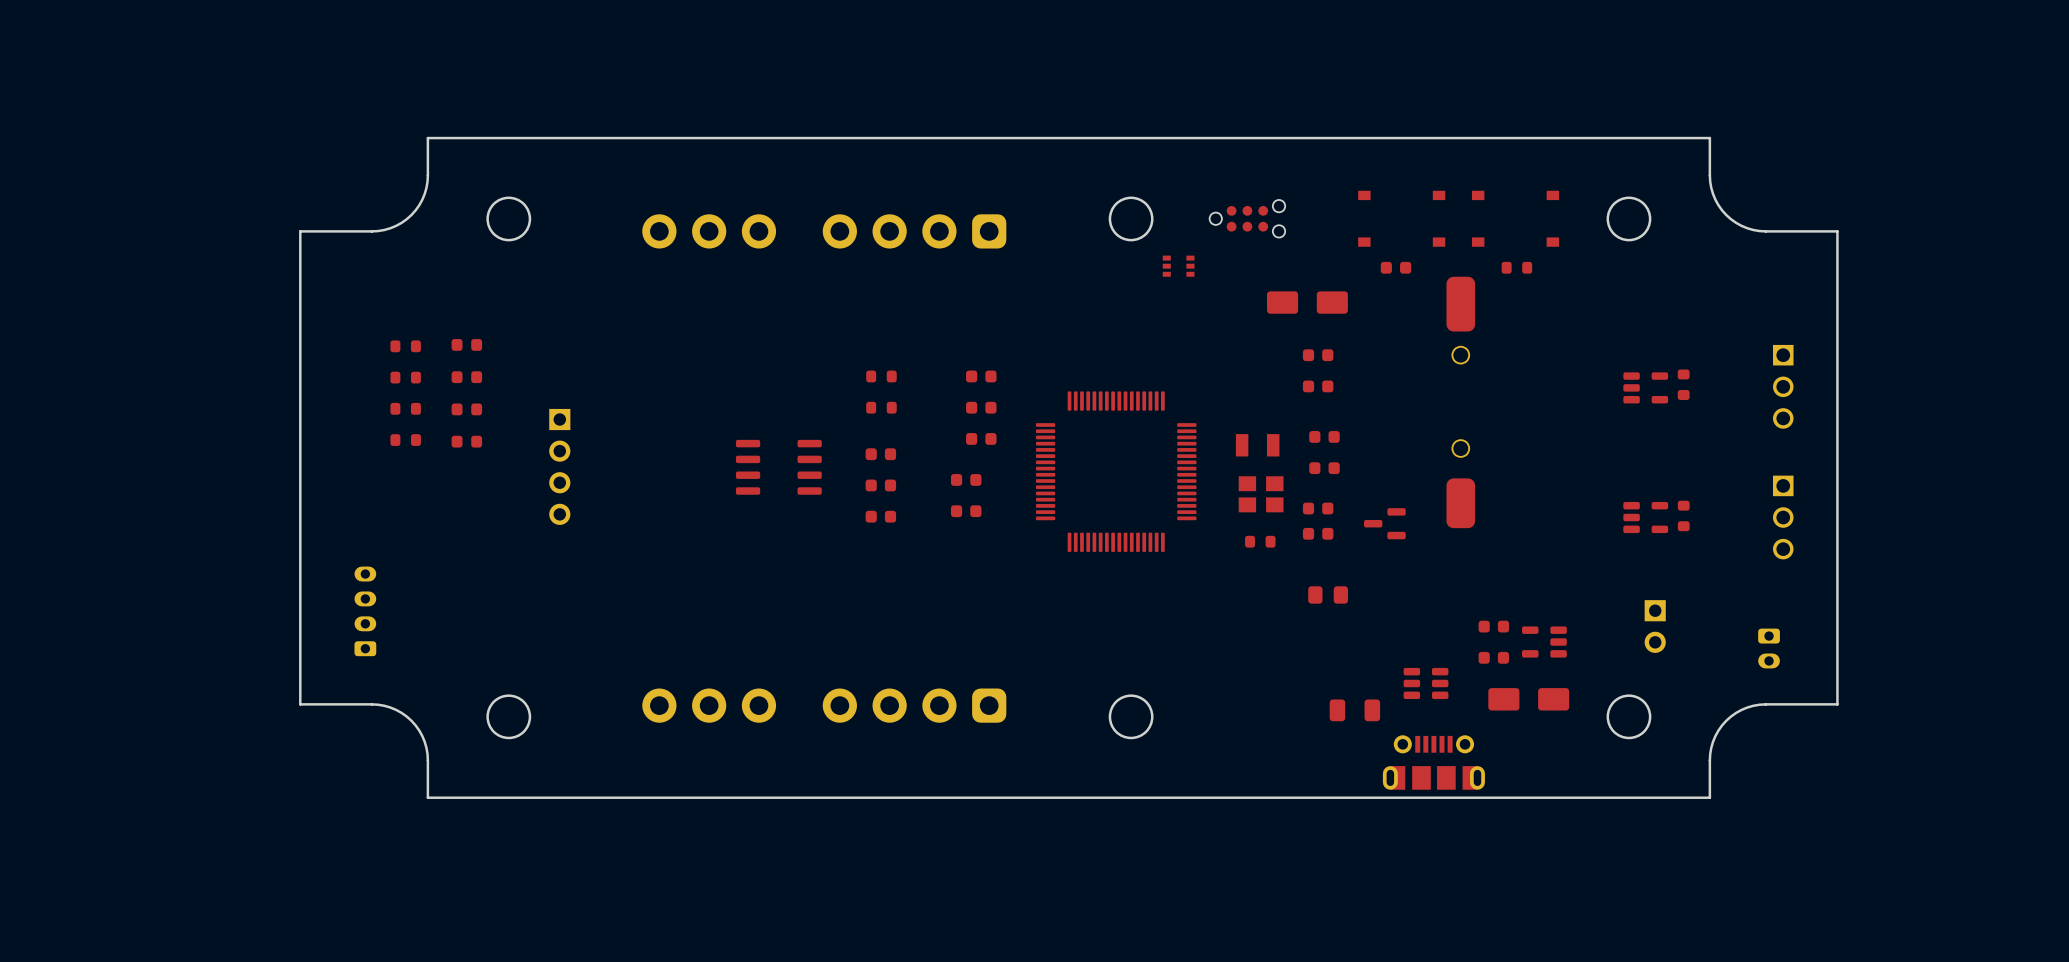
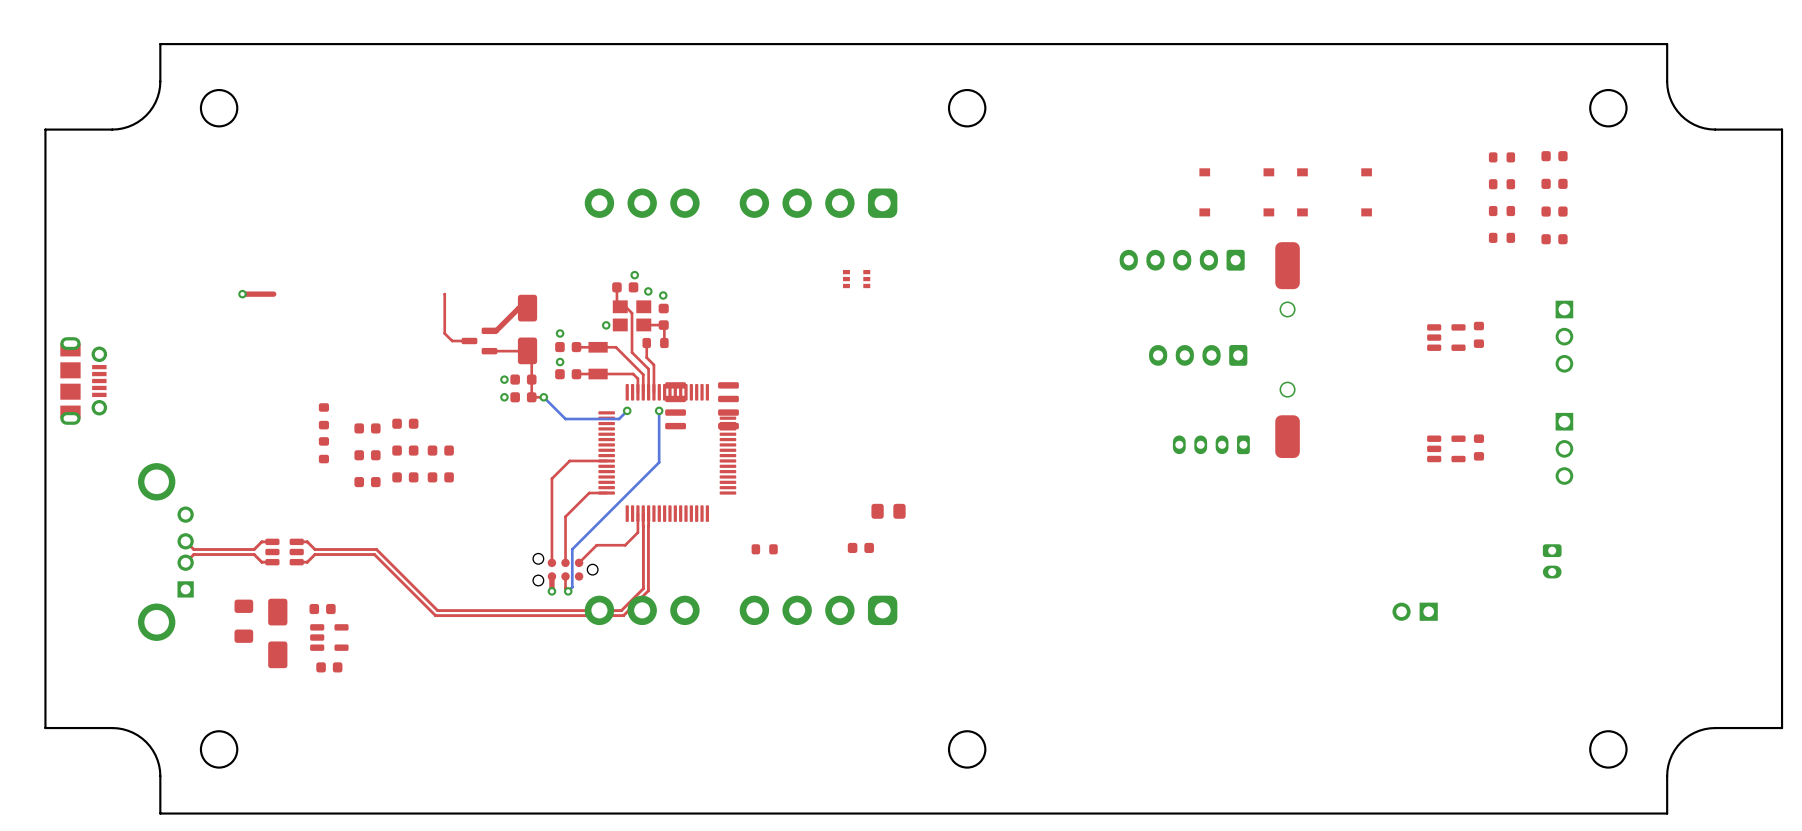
round board edge: none -> [199, 88, 239, 128]
board edge: (1709, 138) (1711, 187) (1718, 205) (1730, 219) (1741, 225) (1759, 231) (1837, 231) (1837, 704) (1759, 704) (1747, 707) (1730, 716) (1718, 730) (1711, 747) (1709, 797) (427, 797) (426, 747) (419, 730) (406, 716) (396, 709) (378, 704) (300, 704) (300, 231) (378, 231) (390, 228) (406, 219) (419, 205) (426, 187) (427, 138) (1709, 138) -> (1667, 44) (1668, 92) (1674, 107) (1685, 119) (1699, 126) (1709, 129) (1782, 129) (1782, 728) (1709, 728) (1699, 730) (1685, 738) (1674, 750) (1668, 765) (1667, 813) (160, 813) (159, 765) (152, 750) (142, 738) (128, 730) (117, 728) (45, 728) (45, 129) (117, 129) (128, 126) (142, 119) (152, 107) (159, 92) (160, 44) (1667, 44)
part: none -> (1554, 156)
part: none -> (1501, 157)
round board edge: [486, 196, 532, 242] -> none
part: none -> (1554, 183)
part: none -> (1501, 184)
round board edge position: (1131, 218) -> (967, 108)
part: (1247, 218) -> none
round board edge position: (1628, 218) -> (1608, 108)
part: none -> (1501, 211)
part: none -> (1554, 211)
part position: (1178, 266) -> (856, 279)
part: (1395, 267) -> none
part: (1516, 267) -> none
part: none -> (1501, 237)
part: none -> (1554, 239)
part: none -> (1182, 260)
part: (1307, 302) -> none
via: none -> (634, 275)
top track: none -> (616, 287) (616, 303) (620, 306) (625, 306) (632, 313) (632, 352) (648, 369) (648, 392)
part: none -> (625, 287)
via: none -> (648, 291)
via: none -> (242, 294)
top track: none -> (273, 294) (242, 294)
top track: none -> (444, 294) (444, 333) (452, 340) (469, 340)
via: none -> (663, 295)
part: (466, 344) -> none
part: (405, 346) -> none
top track: none -> (527, 308) (518, 308) (496, 330) (489, 330)
part: (1318, 355) -> none
part: none -> (632, 315)
part: none -> (663, 316)
via: none -> (606, 325)
top track: none -> (643, 325) (663, 325) (664, 343)
part: (881, 376) -> none
part: (981, 376) -> none
part: (405, 377) -> none
part: (466, 377) -> none
part: none -> (527, 329)
via: none -> (560, 333)
part: (1318, 386) -> none
part: none -> (479, 340)
top track: none -> (646, 343) (646, 357) (653, 364) (653, 392)
part: none -> (655, 343)
part: none -> (568, 347)
top track: none -> (576, 347) (615, 347) (643, 374) (643, 392)
top track: none -> (489, 351) (527, 350) (531, 355) (531, 397) (543, 397)
part: (881, 407) -> none
part: (981, 407) -> none
part: (405, 408) -> none
part: none -> (1198, 355)
part: (466, 409) -> none
part: none -> (598, 360)
via: none -> (560, 362)
part: none -> (568, 374)
top track: none -> (576, 374) (633, 374) (637, 378) (637, 392)
via: none -> (504, 379)
part: none -> (523, 379)
part: (1324, 436) -> none
part: none -> (83, 381)
part: (981, 438) -> none
part: (405, 440) -> none
part: (466, 441) -> none
part: (1257, 445) -> none
part: (880, 454) -> none
via: none -> (504, 397)
part: none -> (523, 397)
bottom track: none -> (543, 397) (565, 419) (619, 419) (627, 410)
via: none -> (543, 397)
part: (559, 466) -> none
part: (1324, 468) -> none
part: (1116, 471) -> none
via: none -> (627, 410)
bottom track: none -> (659, 410) (659, 462) (572, 549) (572, 587) (568, 591)
via: none -> (659, 410)
part: none -> (323, 416)
part: (966, 479) -> none
part: (880, 485) -> none
part: none -> (405, 423)
part: none -> (367, 428)
part: (1261, 494) -> none
part: (1318, 508) -> none
part: (966, 511) -> none
part: none -> (1211, 444)
part: (880, 516) -> none
part: none -> (323, 450)
part: none -> (405, 450)
part: none -> (440, 450)
part: none -> (667, 452)
part: (1384, 523) -> none
part: none -> (367, 455)
top track: none -> (606, 460) (569, 460) (551, 478) (551, 562)
part: (1318, 533) -> none
part: (1260, 541) -> none
part: none -> (405, 477)
part: none -> (440, 477)
part: none -> (367, 482)
top track: none -> (606, 493) (589, 493) (565, 516) (565, 562)
part: none -> (888, 511)
top track: none -> (637, 513) (637, 532) (625, 545) (596, 545) (579, 562)
top track: none -> (643, 513) (643, 588) (621, 610) (437, 610) (376, 549) (314, 549) (307, 541) (296, 541)
top track: none -> (648, 513) (648, 590) (623, 615) (435, 615) (374, 554) (314, 554) (307, 562) (296, 562)
part: (1328, 594) -> none
part: (365, 611) -> none
top track: none -> (185, 541) (193, 549) (254, 549) (261, 541) (272, 541)
part: (1493, 626) -> none
part rotation: 0° (1655, 626) -> 90° clockwise (1415, 611)
part position: (1655, 626) -> (1415, 611)
part: none -> (860, 547)
part: none -> (764, 549)
part: none -> (165, 552)
part: none -> (284, 552)
part: (1544, 642) -> none
top track: none -> (272, 562) (261, 562) (254, 554) (193, 554) (185, 562)
part: (1493, 657) -> none
part: none -> (565, 569)
top track: none -> (551, 576) (551, 591)
top track: none -> (565, 576) (565, 588) (568, 591)
via: none -> (551, 591)
via: none -> (568, 591)
part: (1426, 683) -> none
round board edge: [486, 694, 532, 740] -> none
part: (1528, 699) -> none
part: none -> (322, 609)
part: (1354, 710) -> none
round board edge position: (1131, 716) -> (967, 749)
round board edge position: (1628, 716) -> (1608, 749)
part: none -> (243, 621)
part: none -> (277, 633)
part: none -> (329, 637)
part: (1433, 762) -> none
part: none -> (329, 667)
round board edge: none -> [199, 730, 239, 769]

